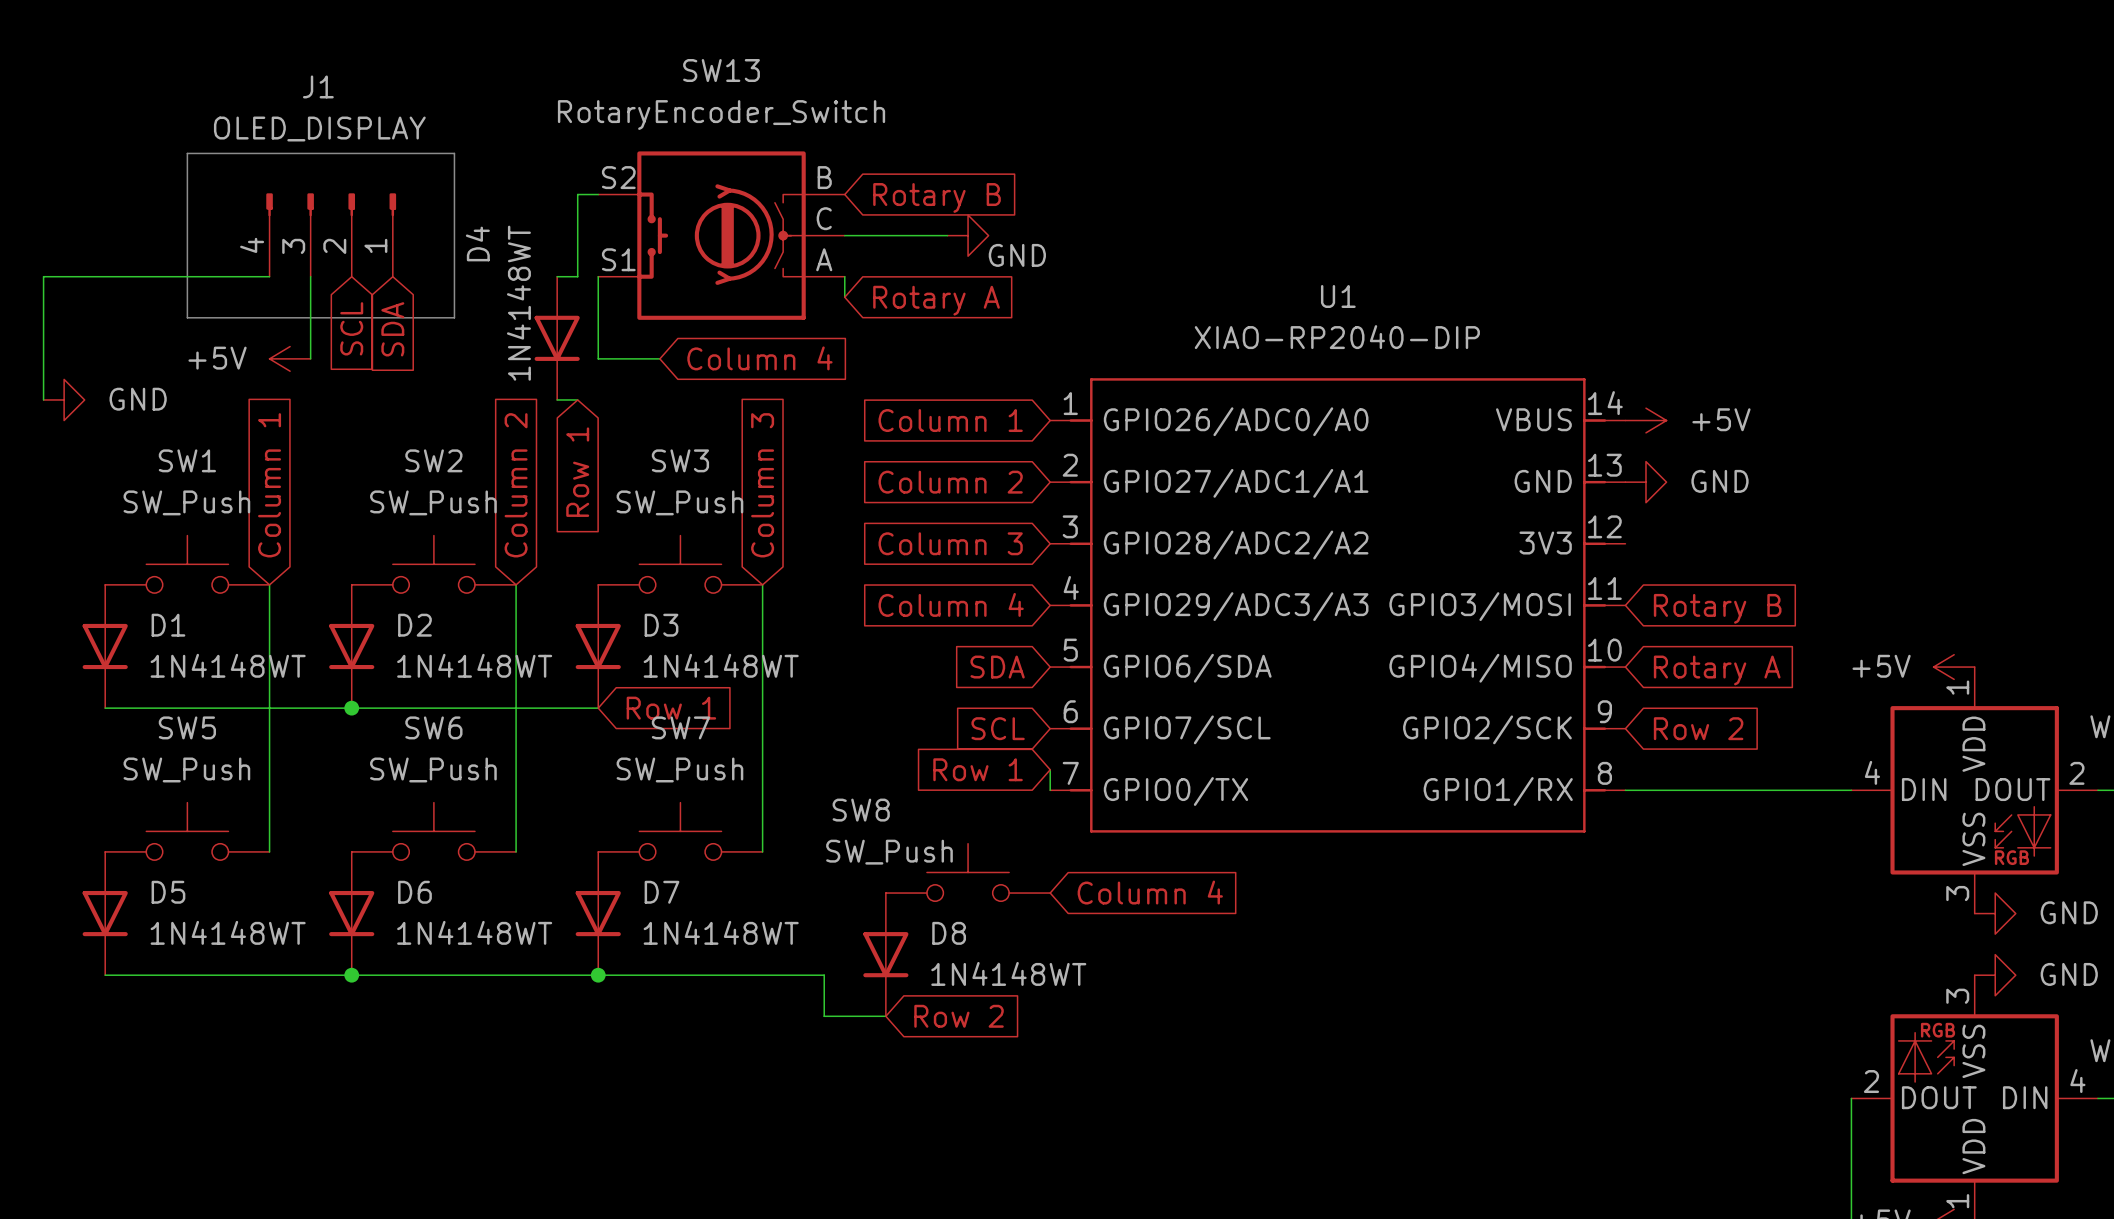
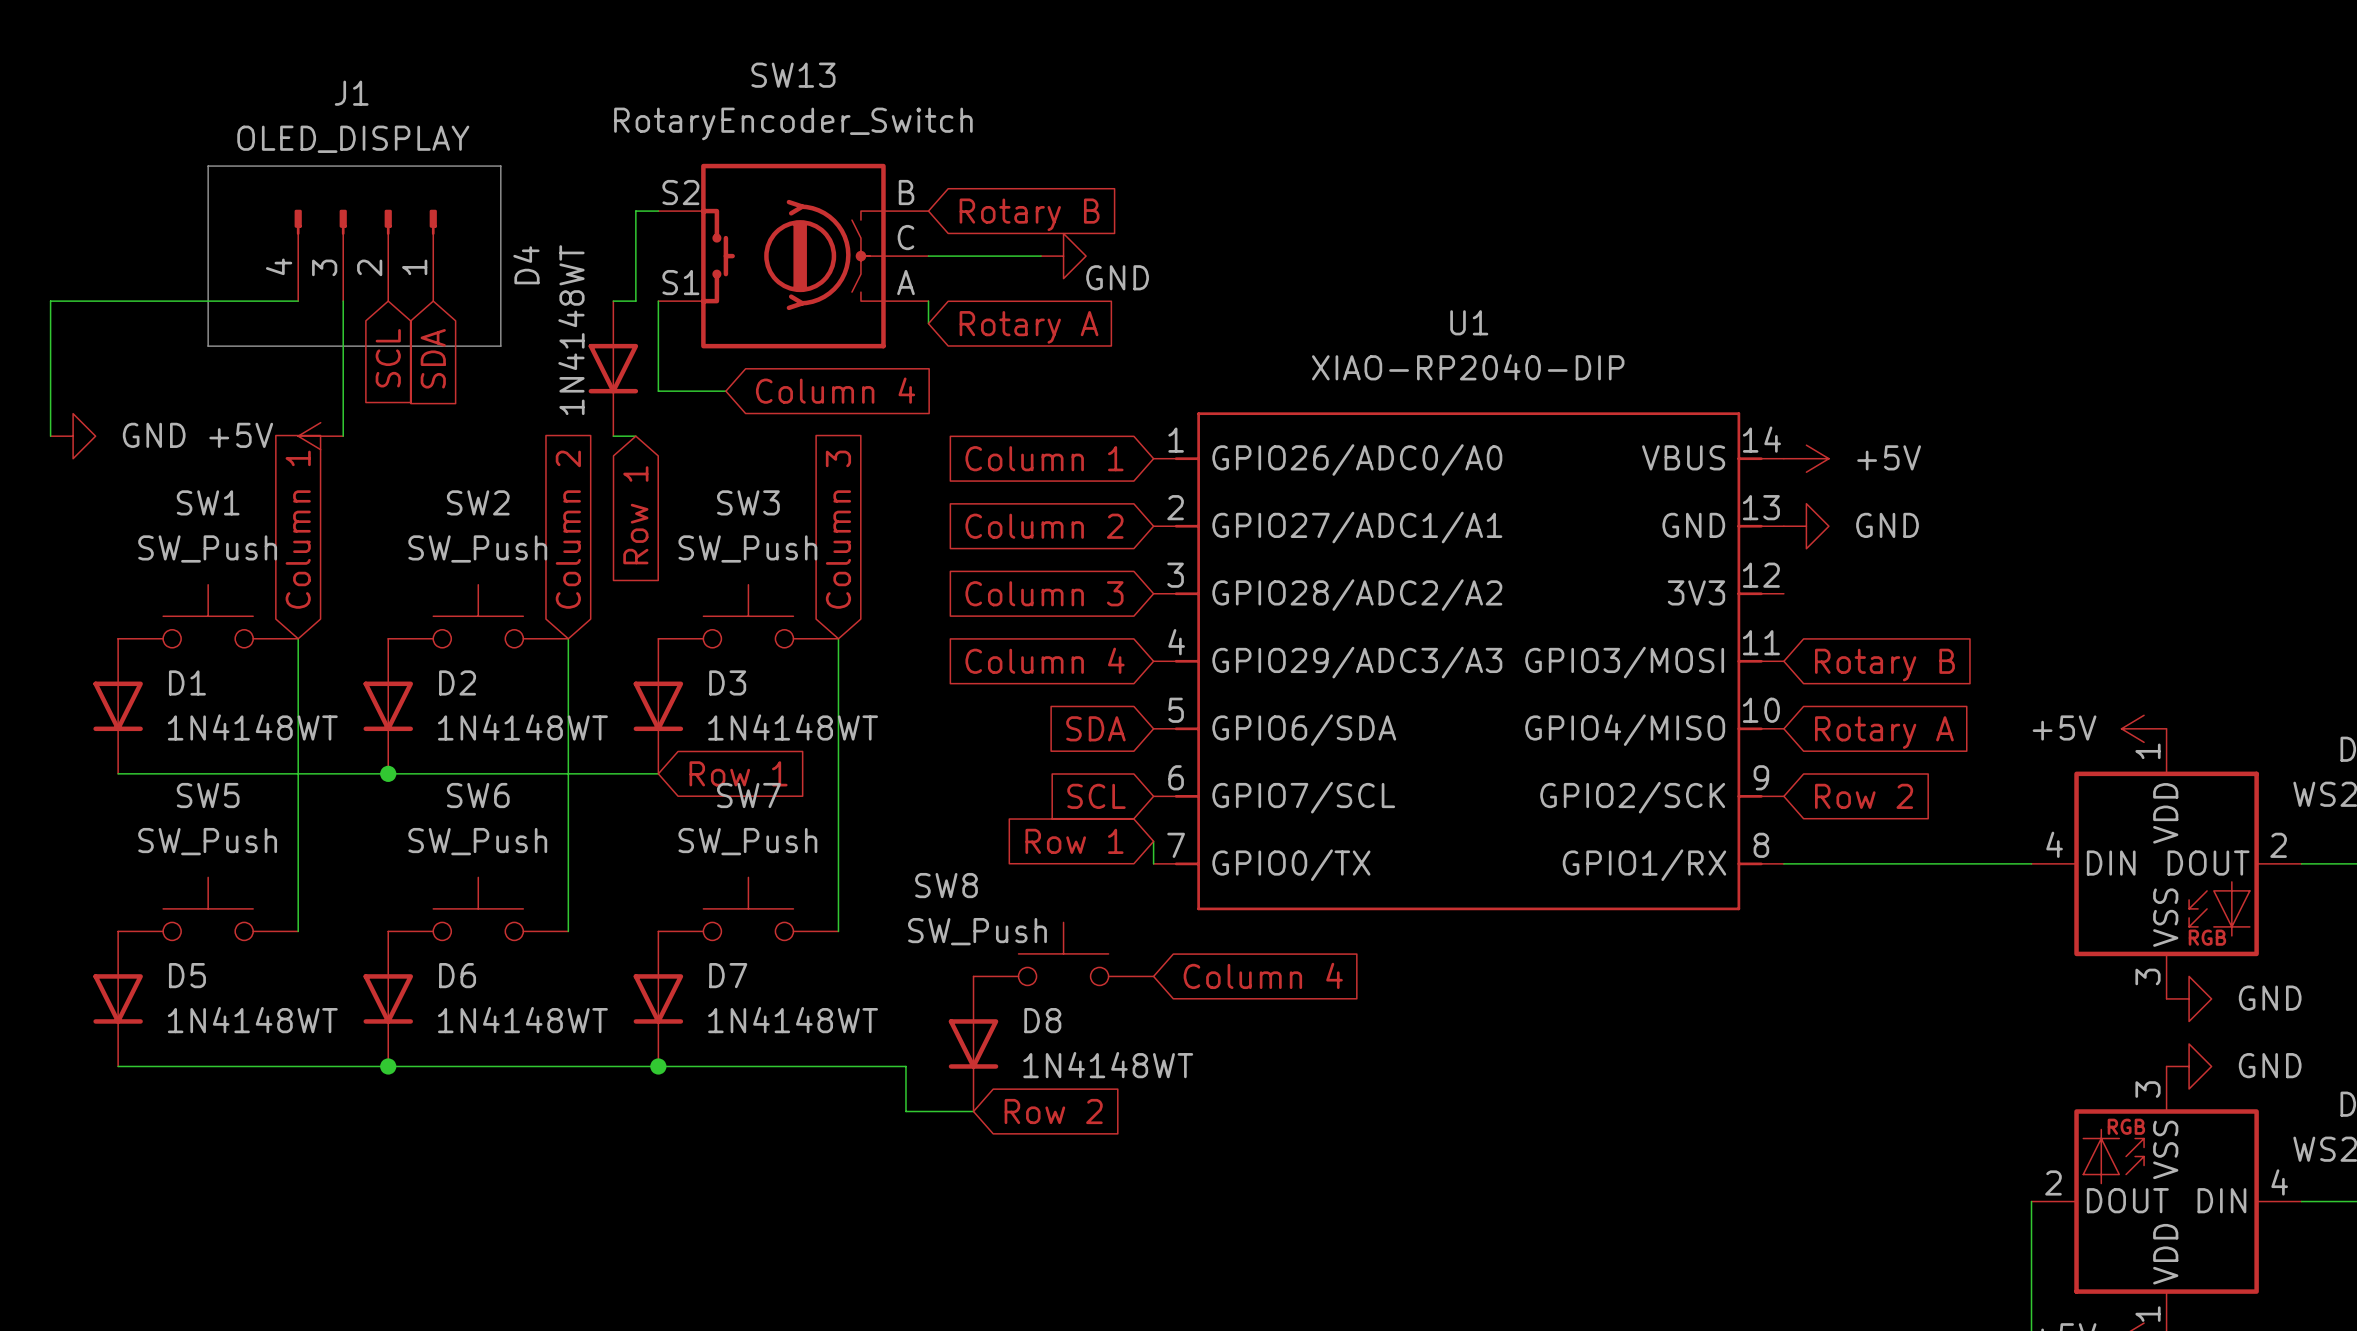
power symbol position: +5V (290, 358) -> +5V (320, 436)
wire: none -> (343, 391) (343, 436)

